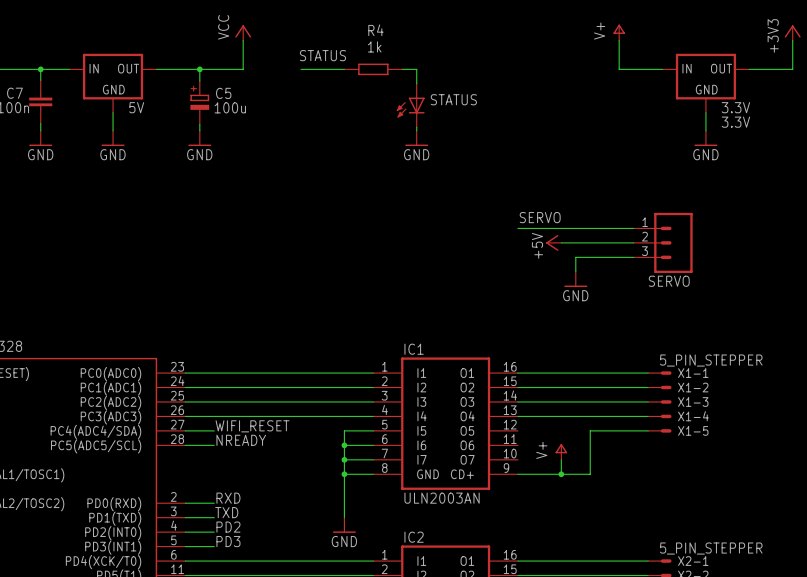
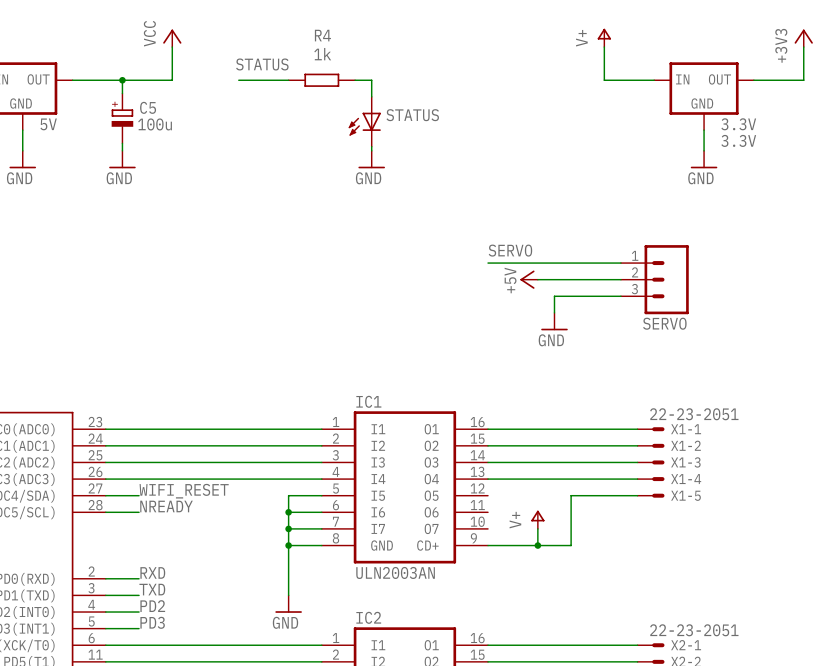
X1-1 value: 5_PIN_STEPPER (711, 360) -> 22-23-2051 (694, 414)
X2-1 value: 5_PIN_STEPPER (711, 548) -> 22-23-2051 (694, 630)

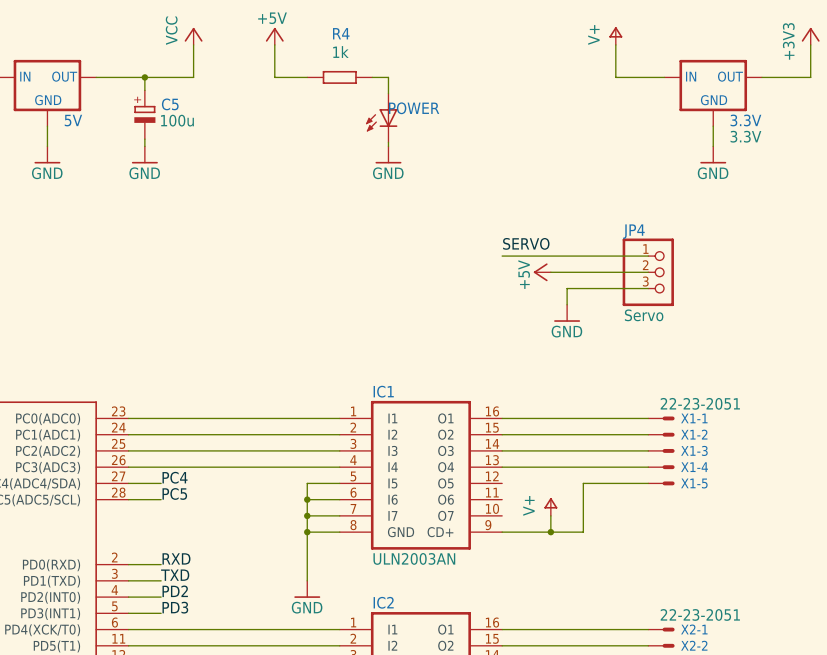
power symbol: none -> +5V (274, 36)
label: STATUS (262, 64) -> none
wire: (238, 80) (255, 80) -> (274, 44) (274, 77)
STATUS name: STATUS (412, 115) -> POWER (414, 108)
JP4: none -> Servo (648, 272)
SERVO: (654, 279) -> none
label: WIFI_RESET (184, 491) -> PC4 (175, 477)
label: NREADY (166, 506) -> PC5 (174, 493)

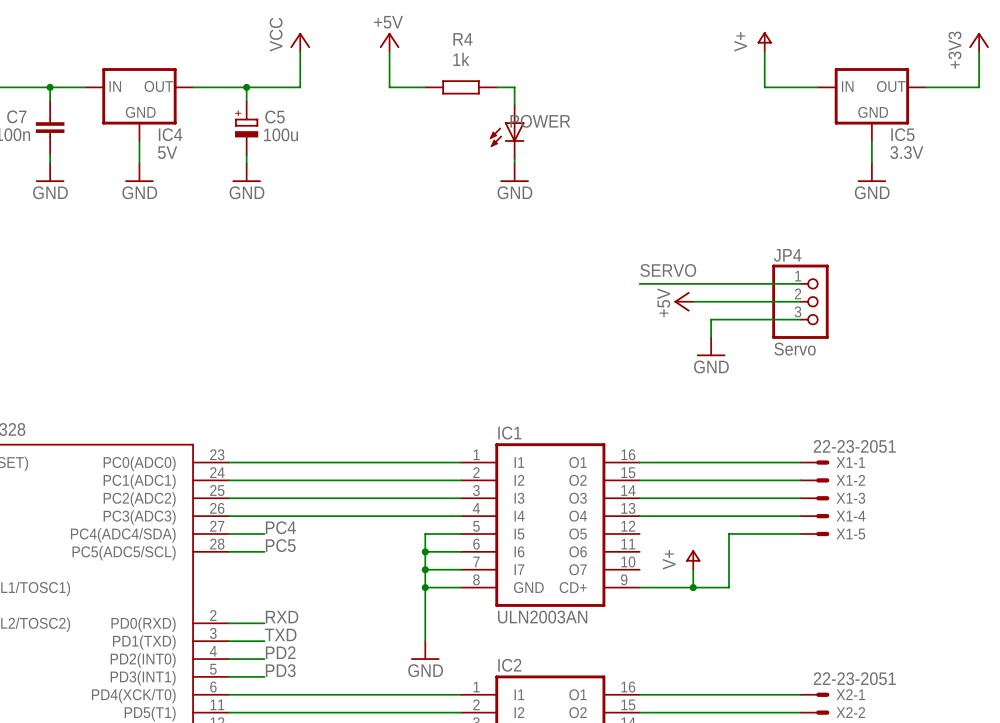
5V name: 5V (73, 120) -> IC4 (170, 134)
3.3V name: 3.3V (745, 120) -> IC5 (902, 134)
5V value: none -> 5V (167, 152)

